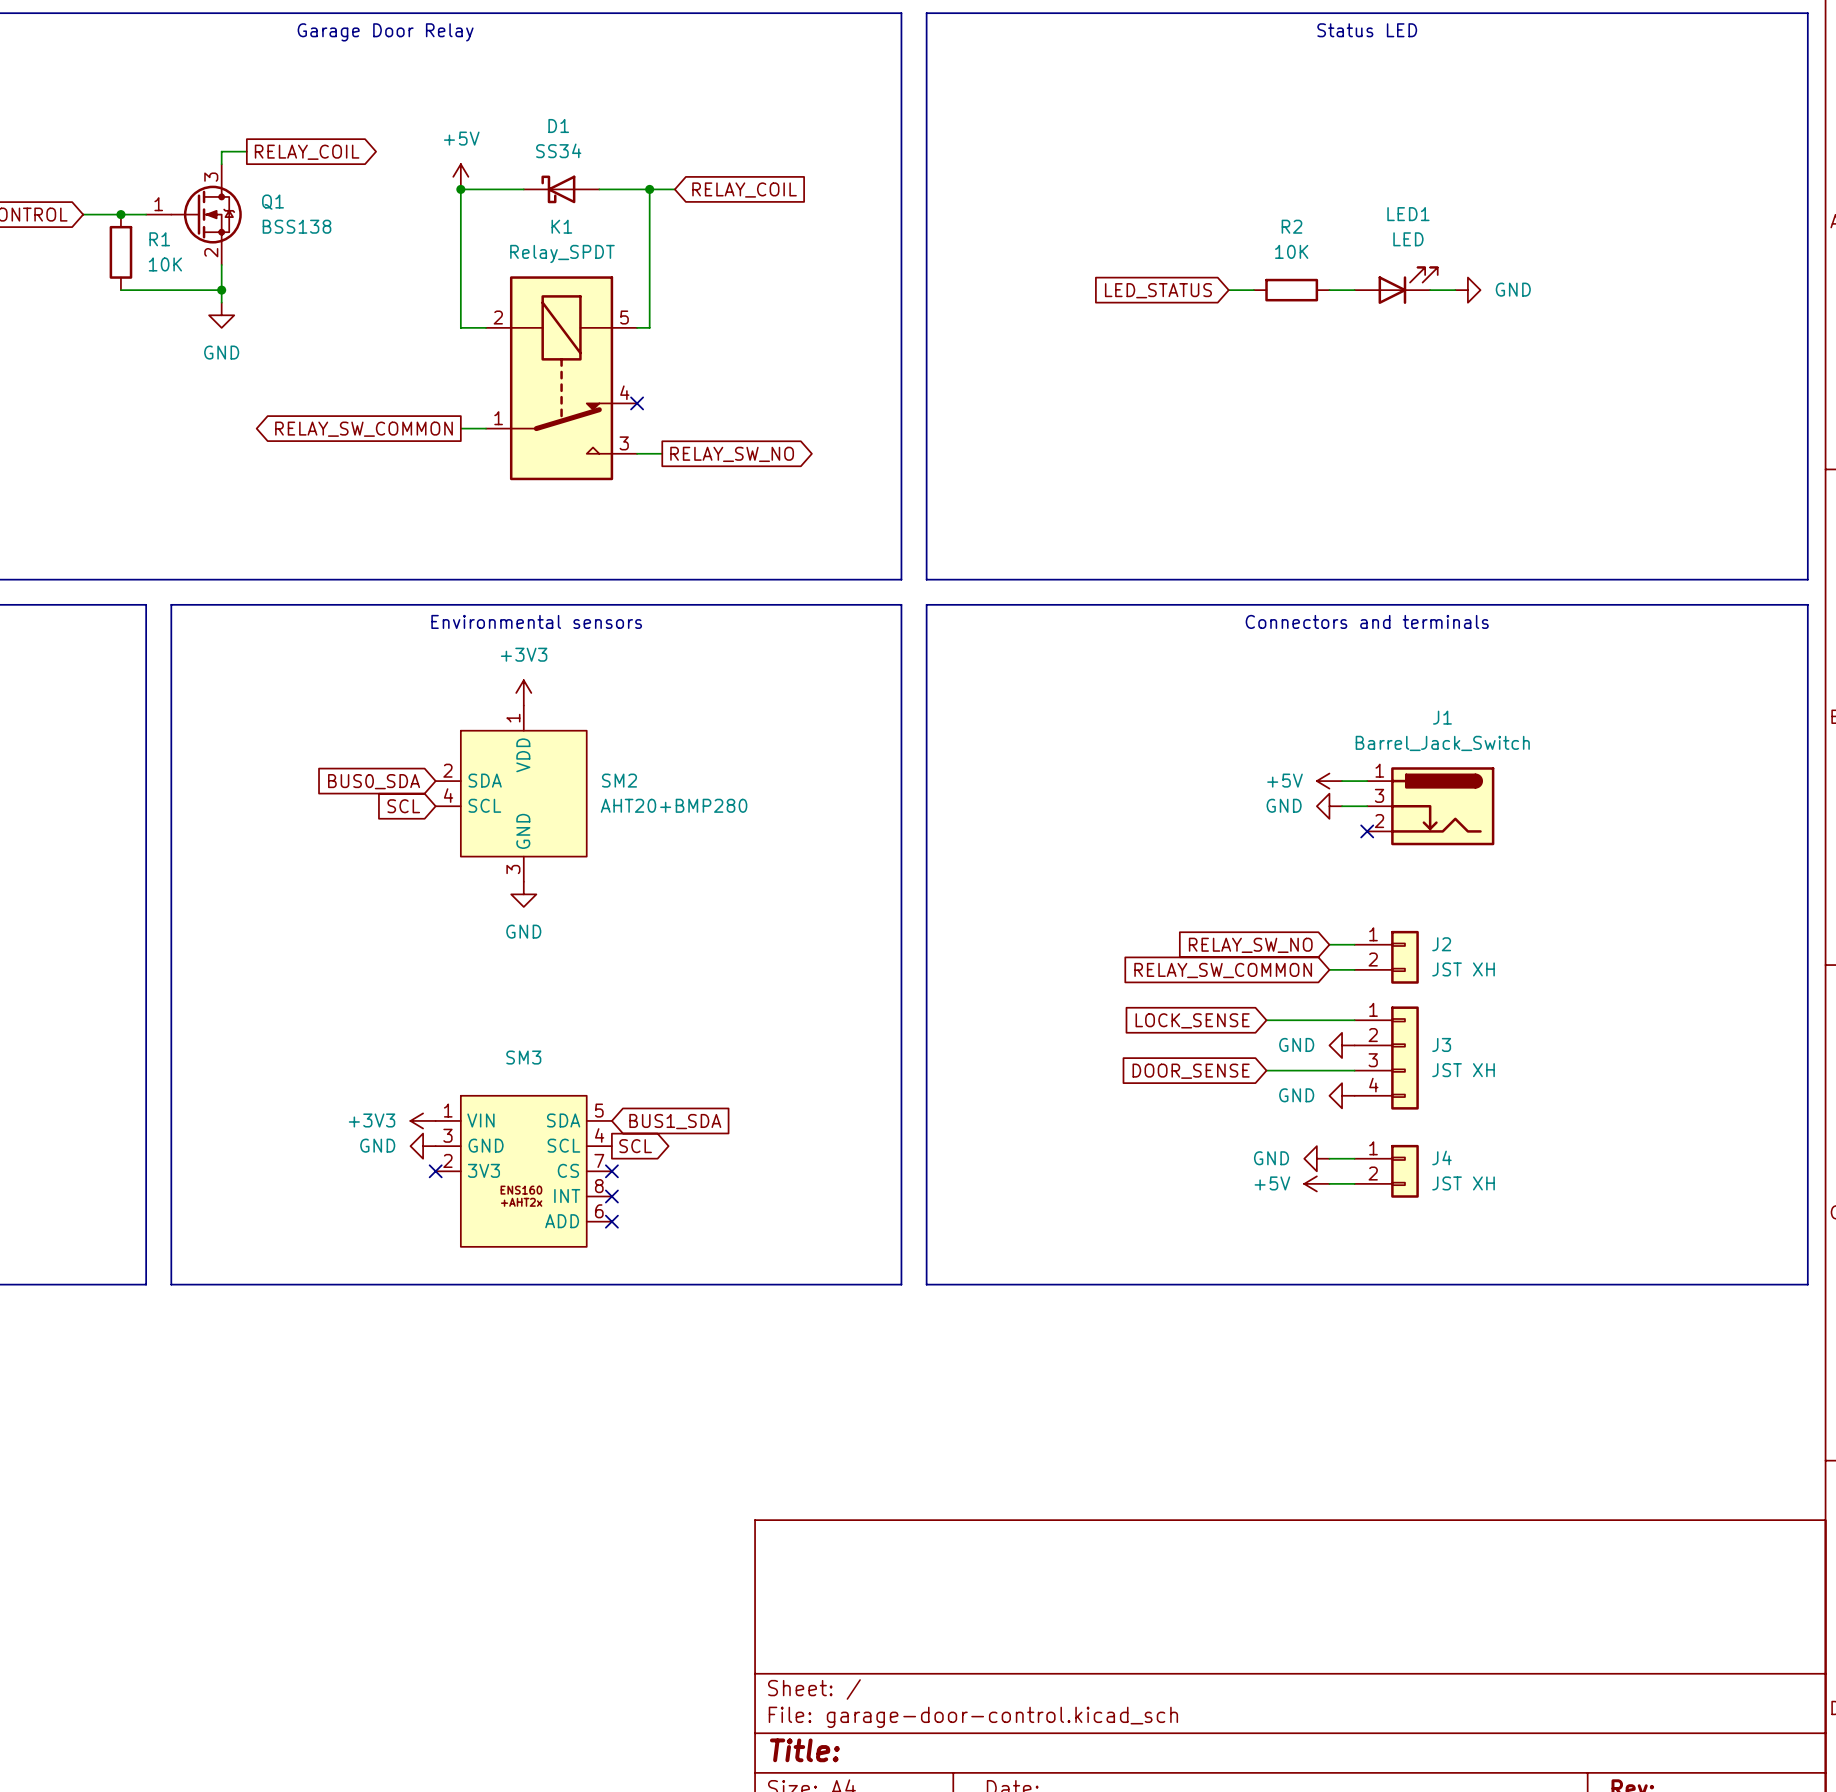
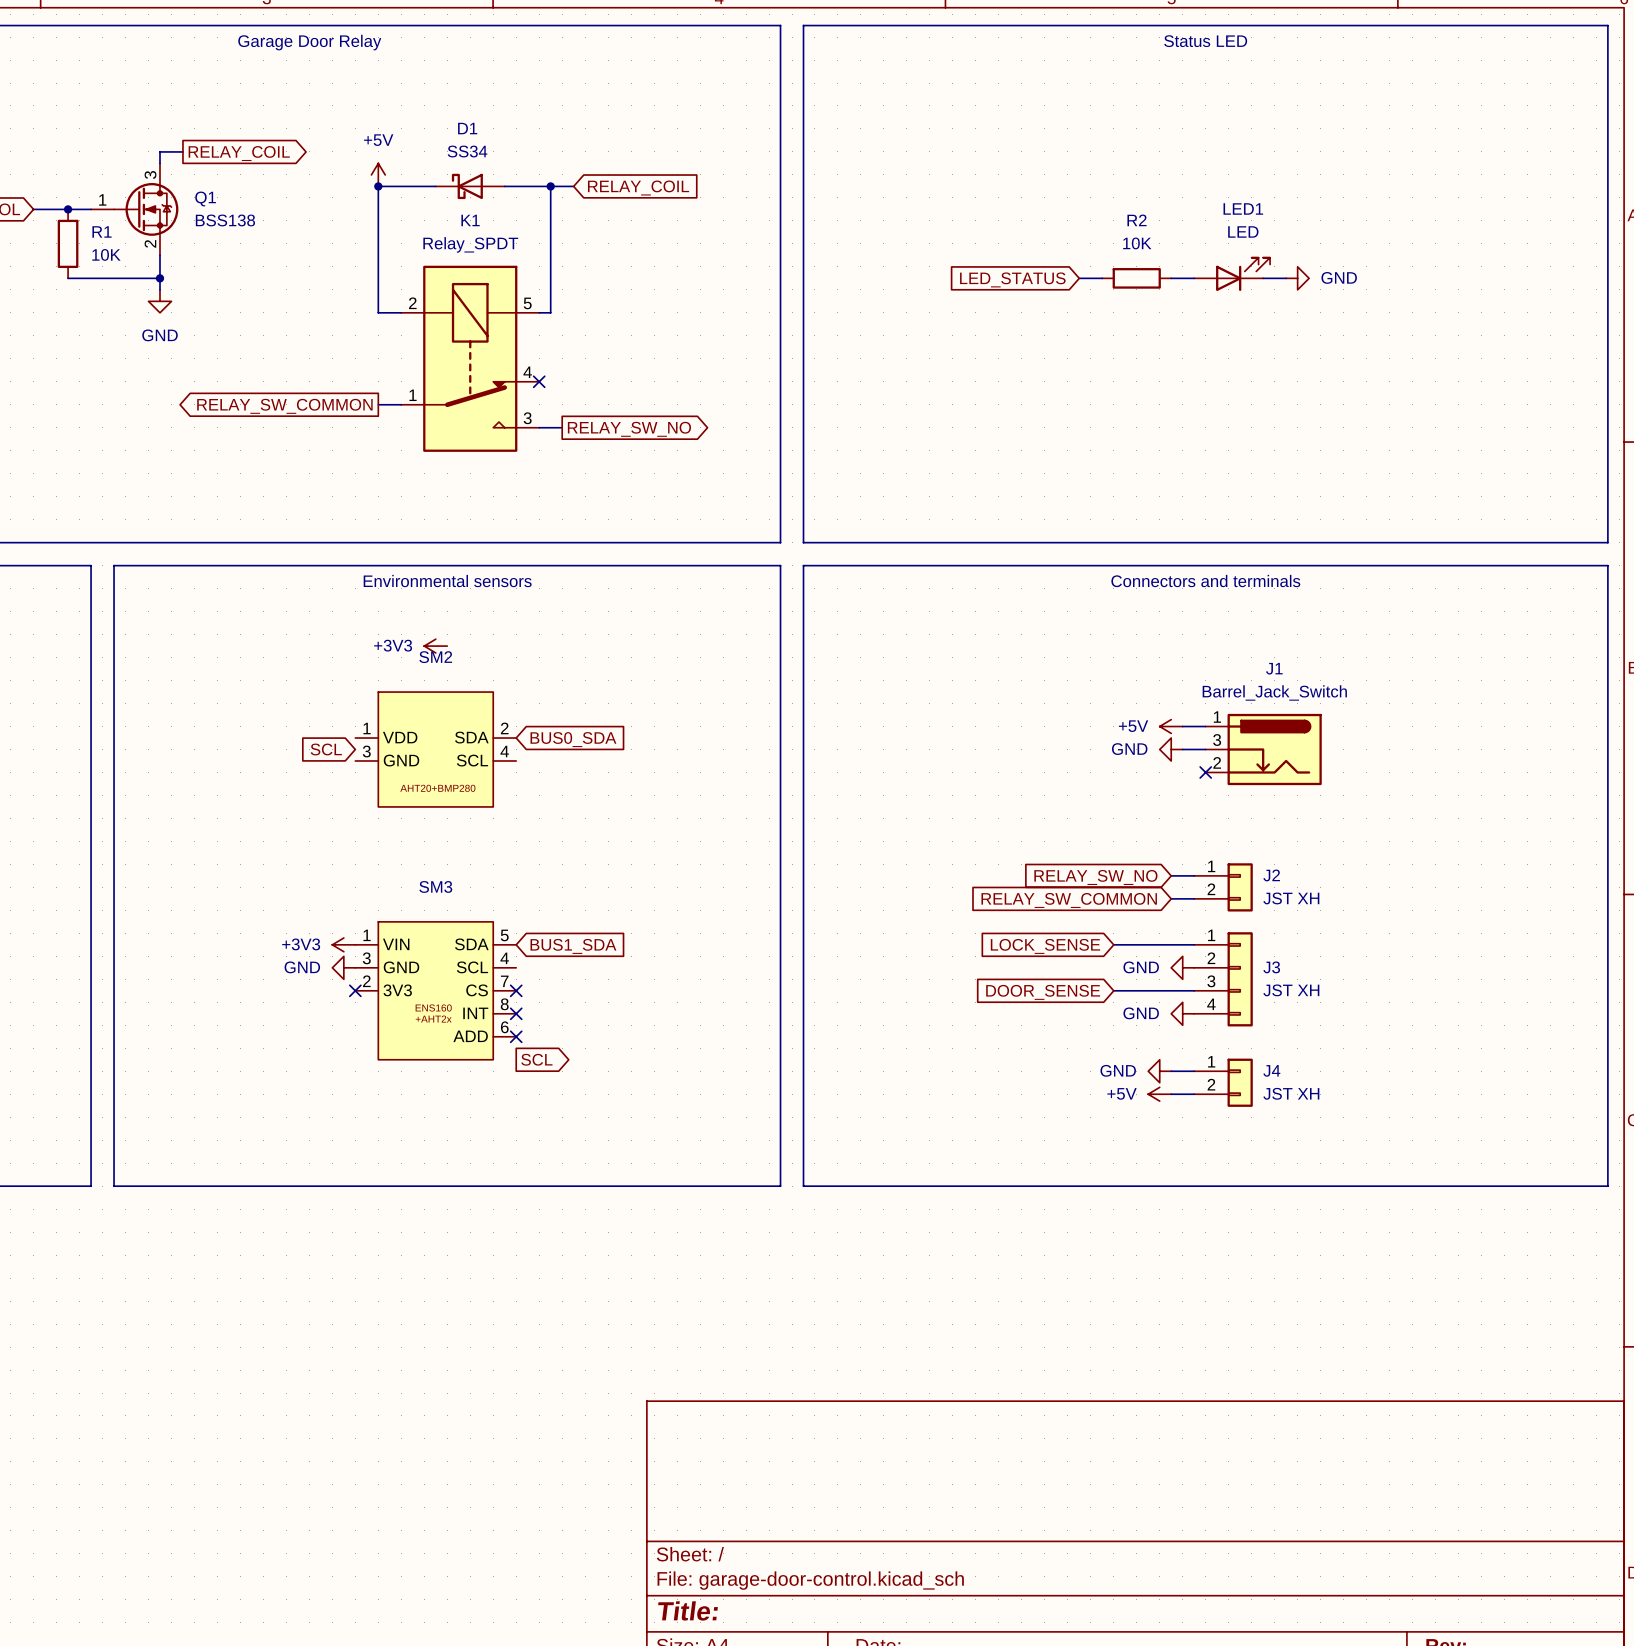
power symbol rotation: 0° (523, 692) -> 90° counterclockwise (435, 646)
SM2 symbol: [435, 705, 587, 882] -> [355, 692, 517, 807]
SM2 name position: SM2 (619, 780) -> SM2 (435, 657)
global label rotation: 0° (374, 781) -> 180° (573, 739)
global label position: BUS0_SDA (374, 781) -> BUS0_SDA (573, 739)
SM2 value: AHT20+BMP280 (674, 805) -> none
power symbol: GND (523, 894) -> none
power symbol: none -> GND (343, 967)
no-connect mark: none -> (355, 990)
no-connect mark: none -> (516, 990)
no-connect mark: none -> (516, 1013)
power symbol position: +3V3 (423, 1120) -> +3V3 (343, 944)
no-connect mark: none -> (516, 1036)
global label position: BUS1_SDA (675, 1121) -> BUS1_SDA (573, 946)
power symbol: GND (423, 1146) -> none
no-connect mark: (435, 1171) -> none
SM3 position: (523, 1171) -> (435, 990)
no-connect mark: (611, 1171) -> none
no-connect mark: (611, 1196) -> none
no-connect mark: (611, 1221) -> none

